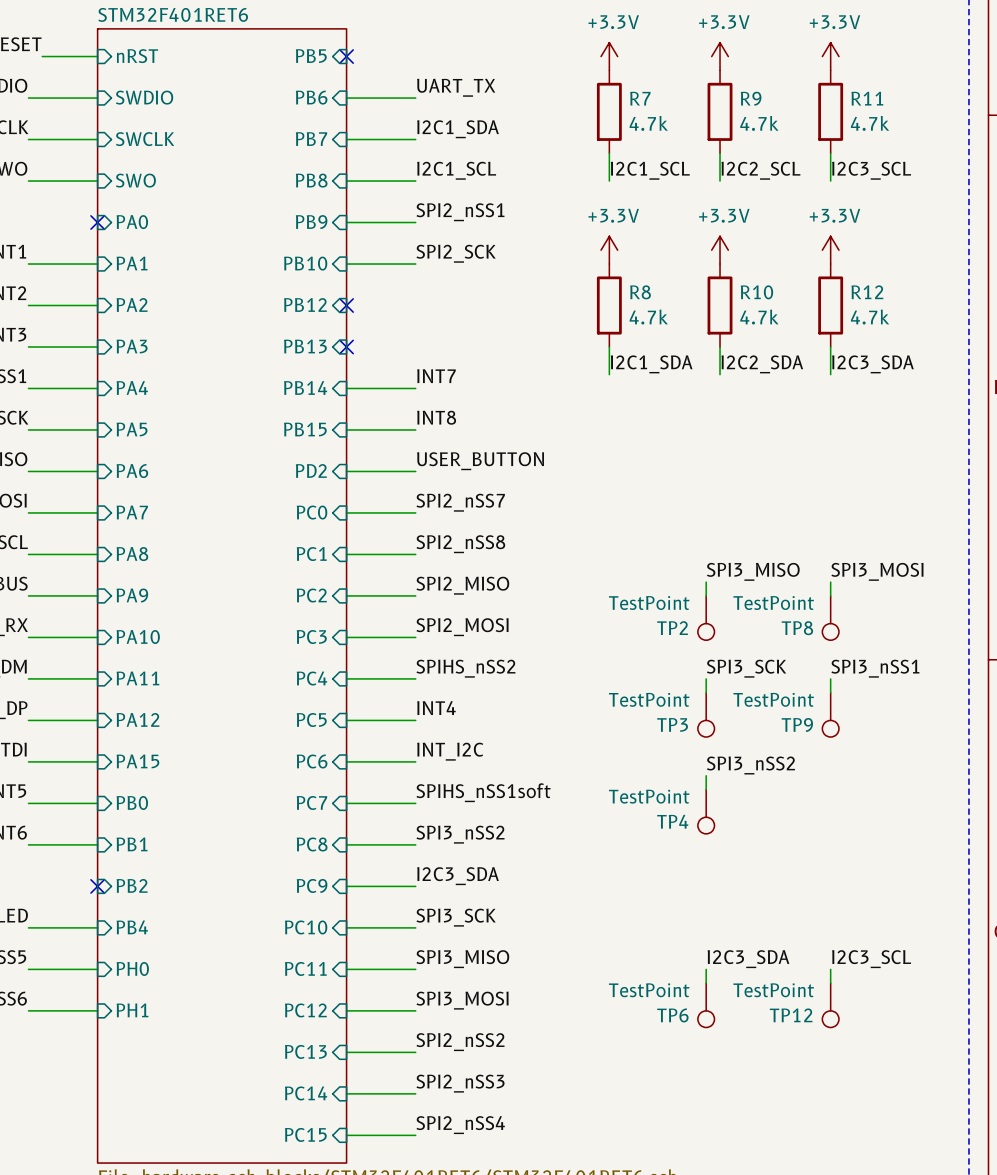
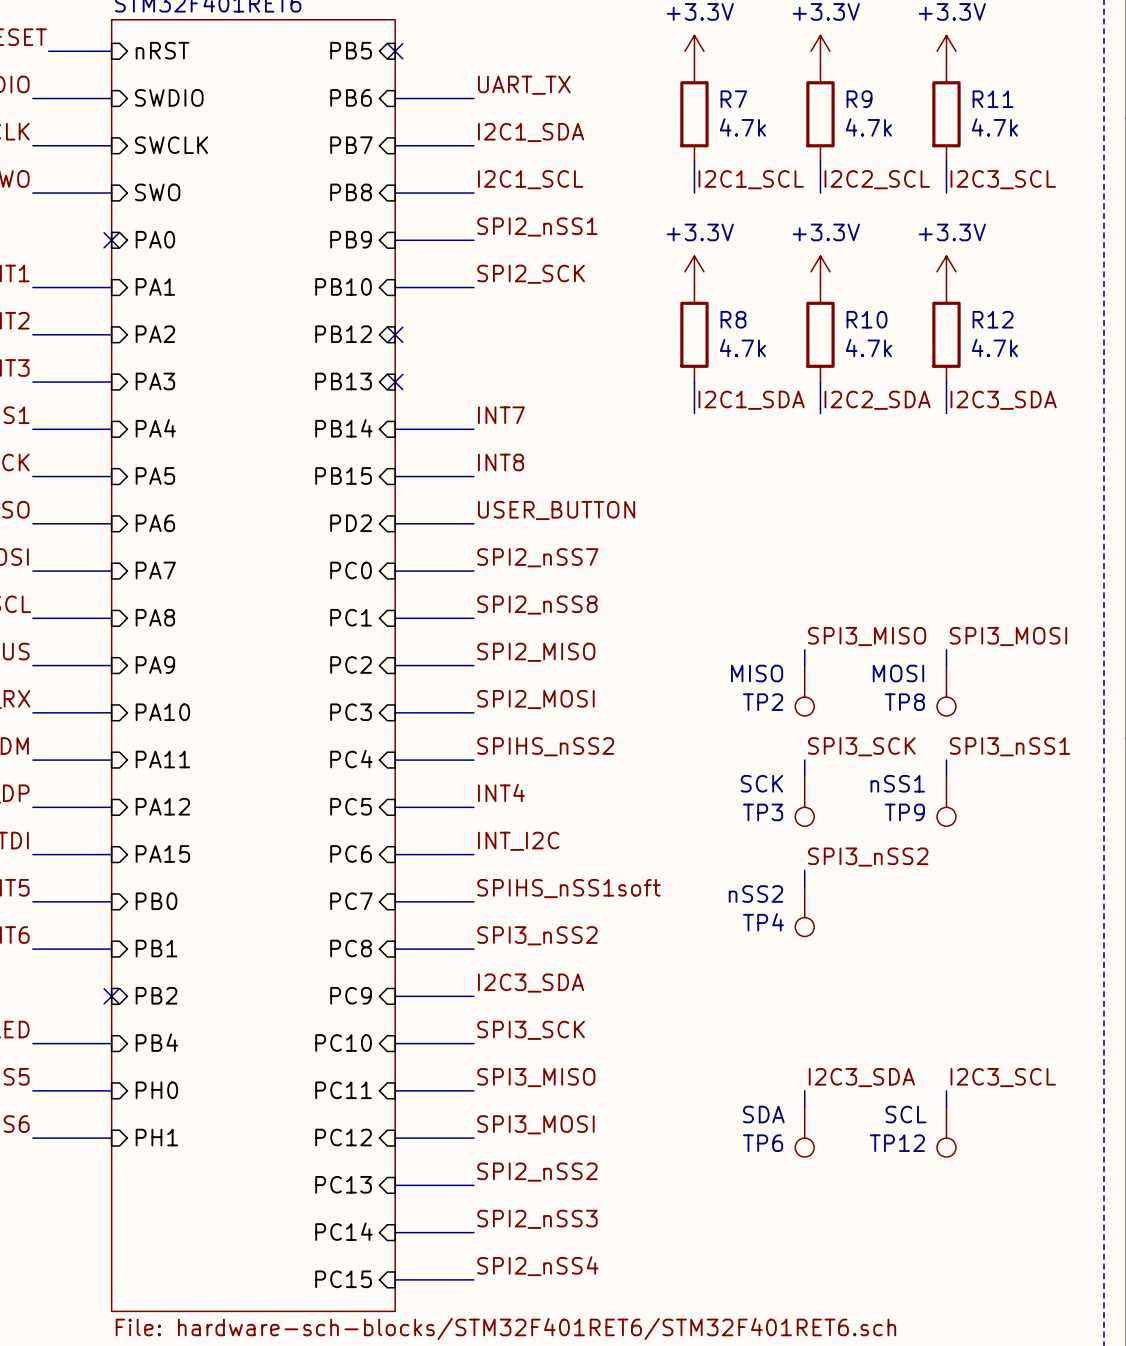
TP2 value: TestPoint (649, 603) -> MISO (757, 673)
TP8 value: TestPoint (773, 603) -> MOSI (898, 673)
TP3 value: TestPoint (649, 699) -> SCK (761, 783)
TP9 value: TestPoint (773, 699) -> nSS1 (897, 783)
TP4 value: TestPoint (649, 796) -> nSS2 (755, 894)
TP6 value: TestPoint (649, 990) -> SDA (763, 1114)
TP12 value: TestPoint (773, 990) -> SCL (905, 1114)

